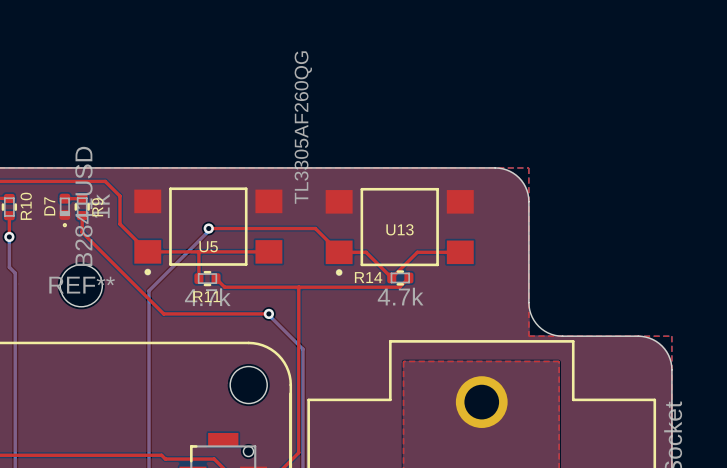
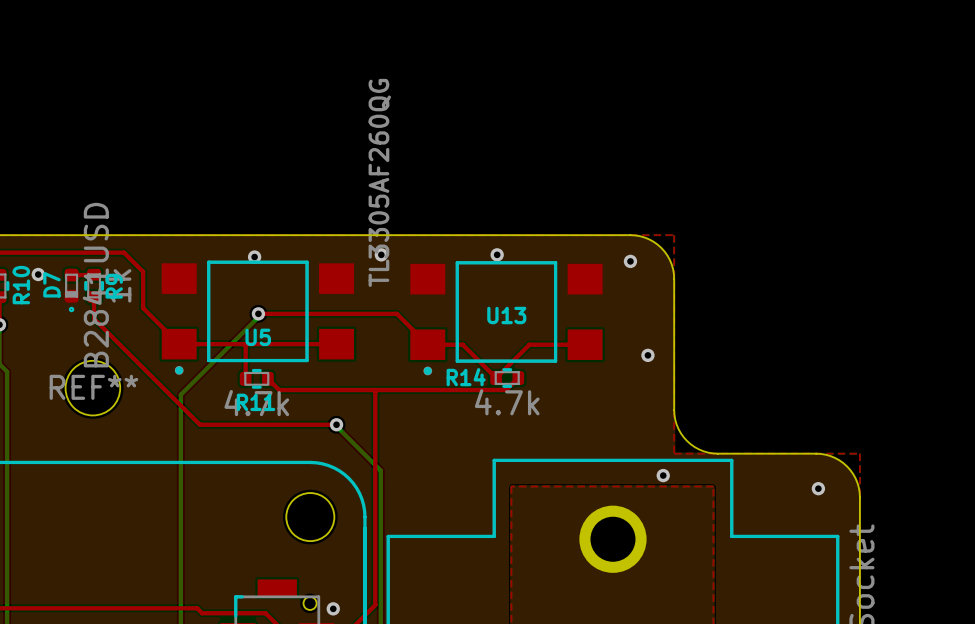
via: none -> (381, 254)
via: none -> (497, 254)
via: none -> (254, 257)
via: none -> (630, 261)
via: none -> (38, 274)
via: none -> (647, 355)
via: none -> (663, 475)
via: none -> (818, 488)
via: none -> (333, 608)

